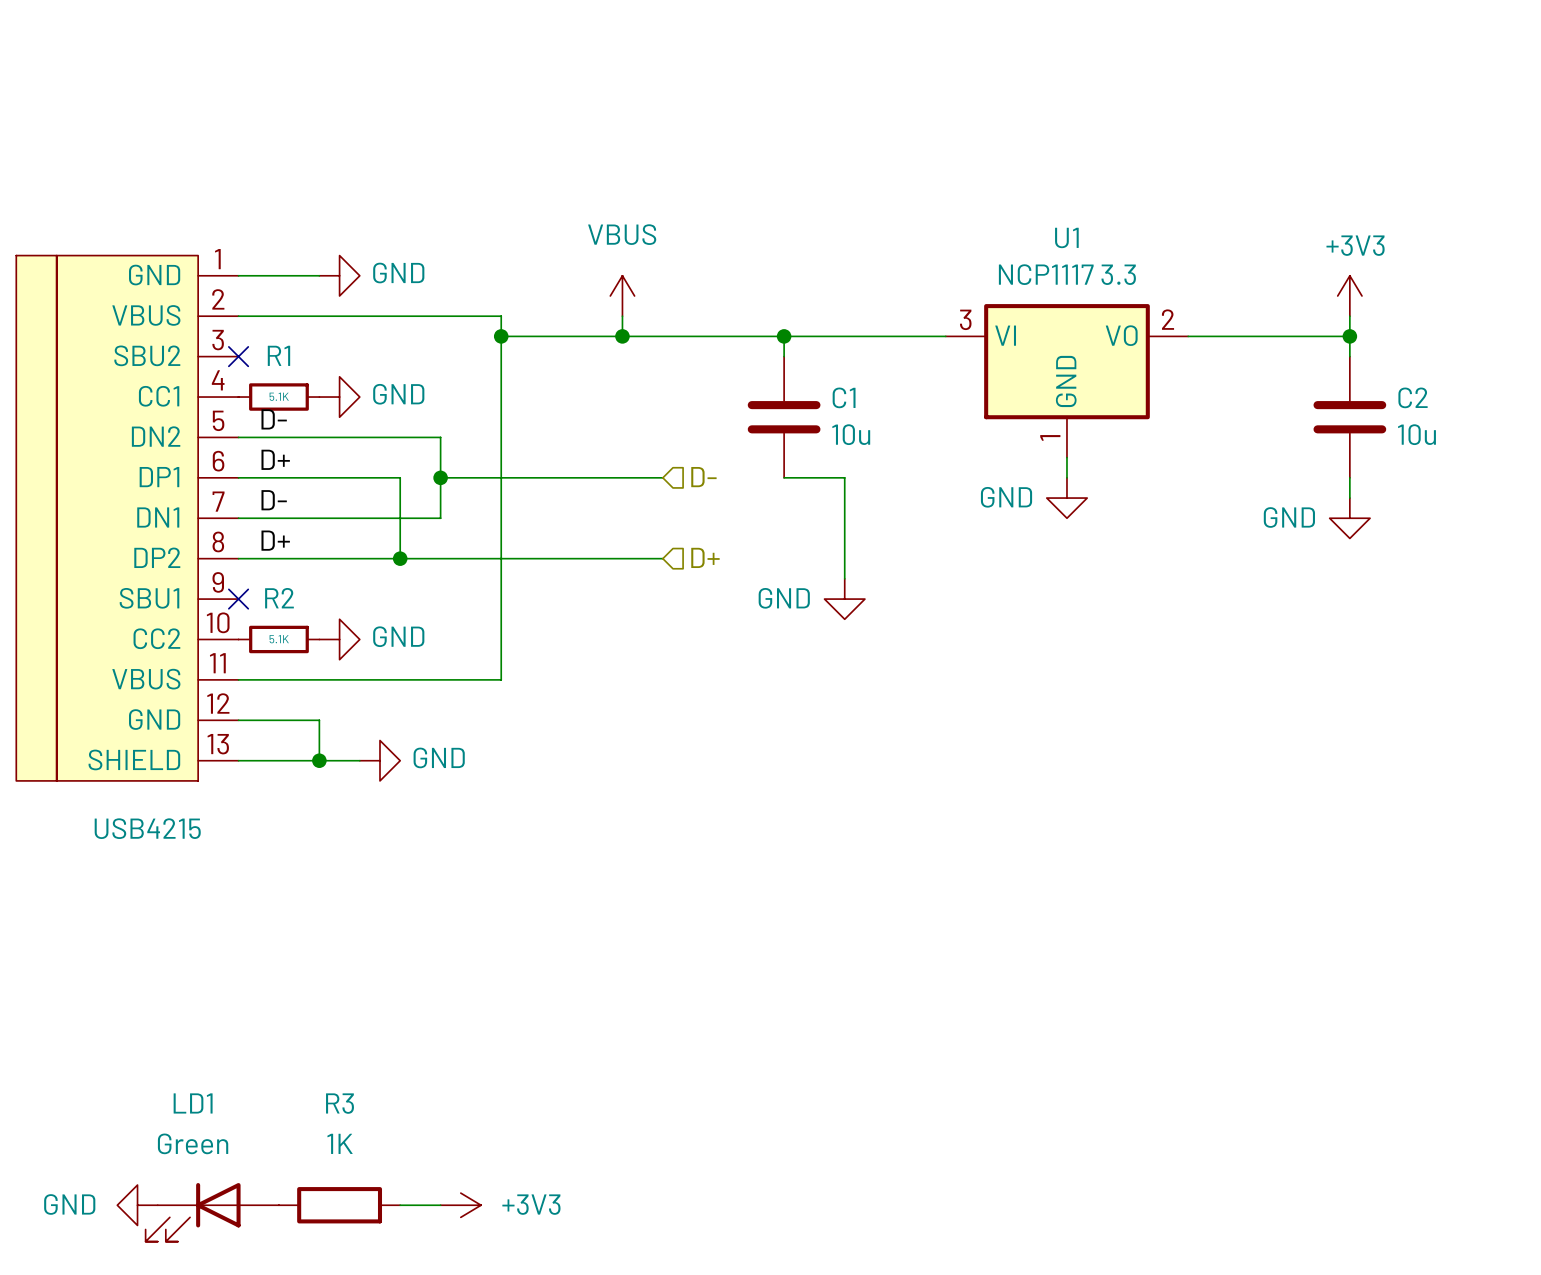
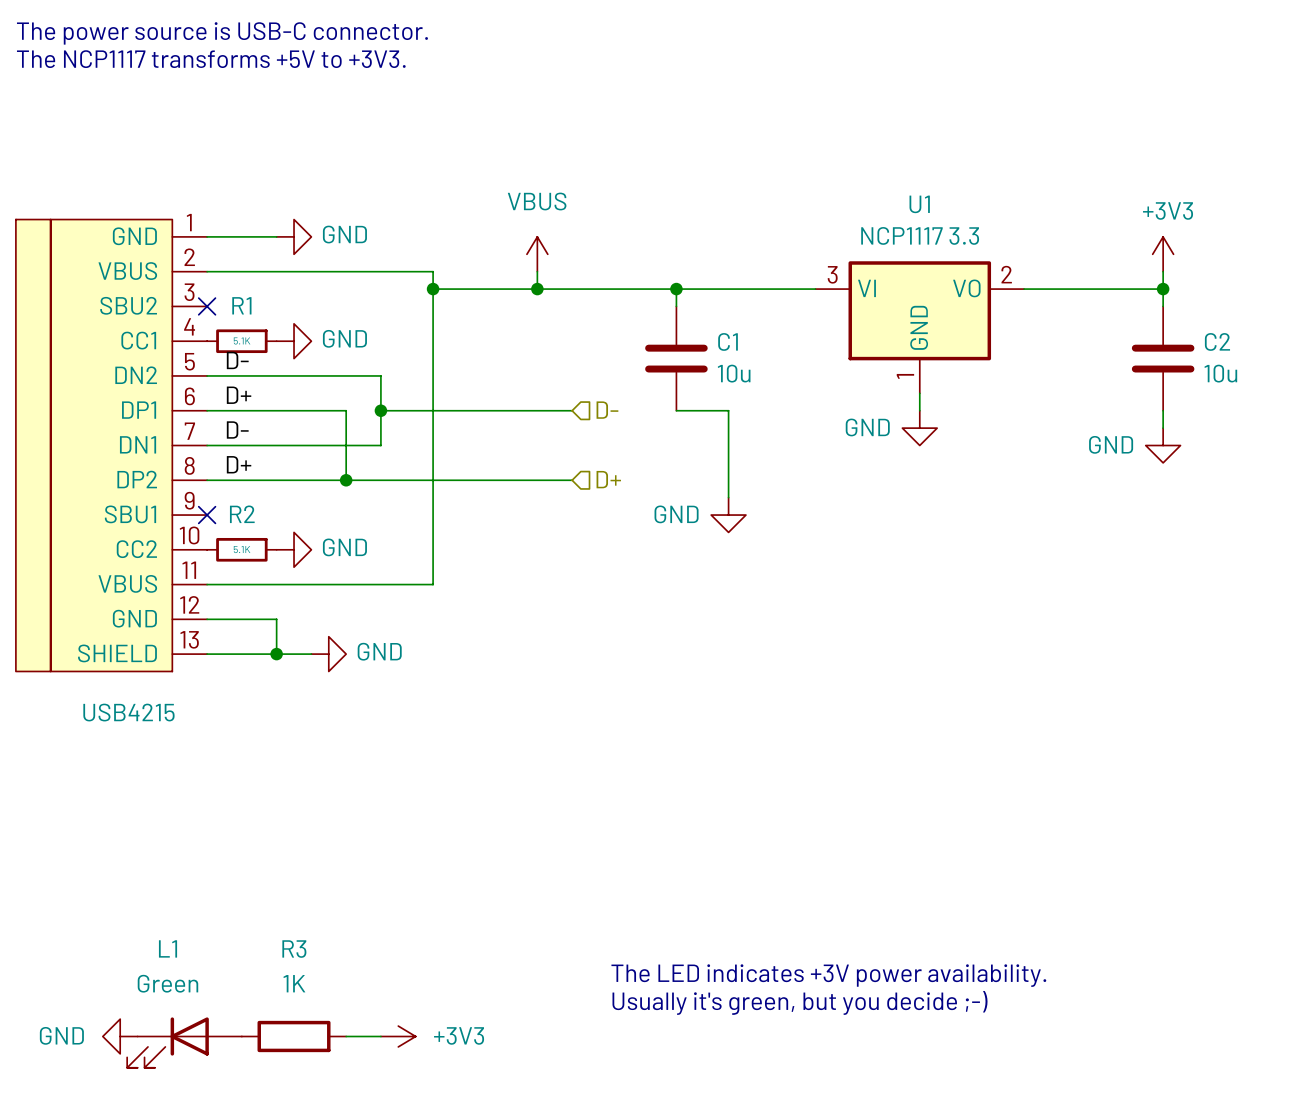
text: none -> The power source is USB-C connector. (222, 33)
text: none -> The NCP1117 transforms +5V to +3V3. (211, 59)
LD1 name: LD1 (193, 1103) -> L1 (168, 948)
text: none -> The LED indicates +3V power availability. (828, 975)
text: none -> Usually it's green, but you decide ;-) (800, 1002)

